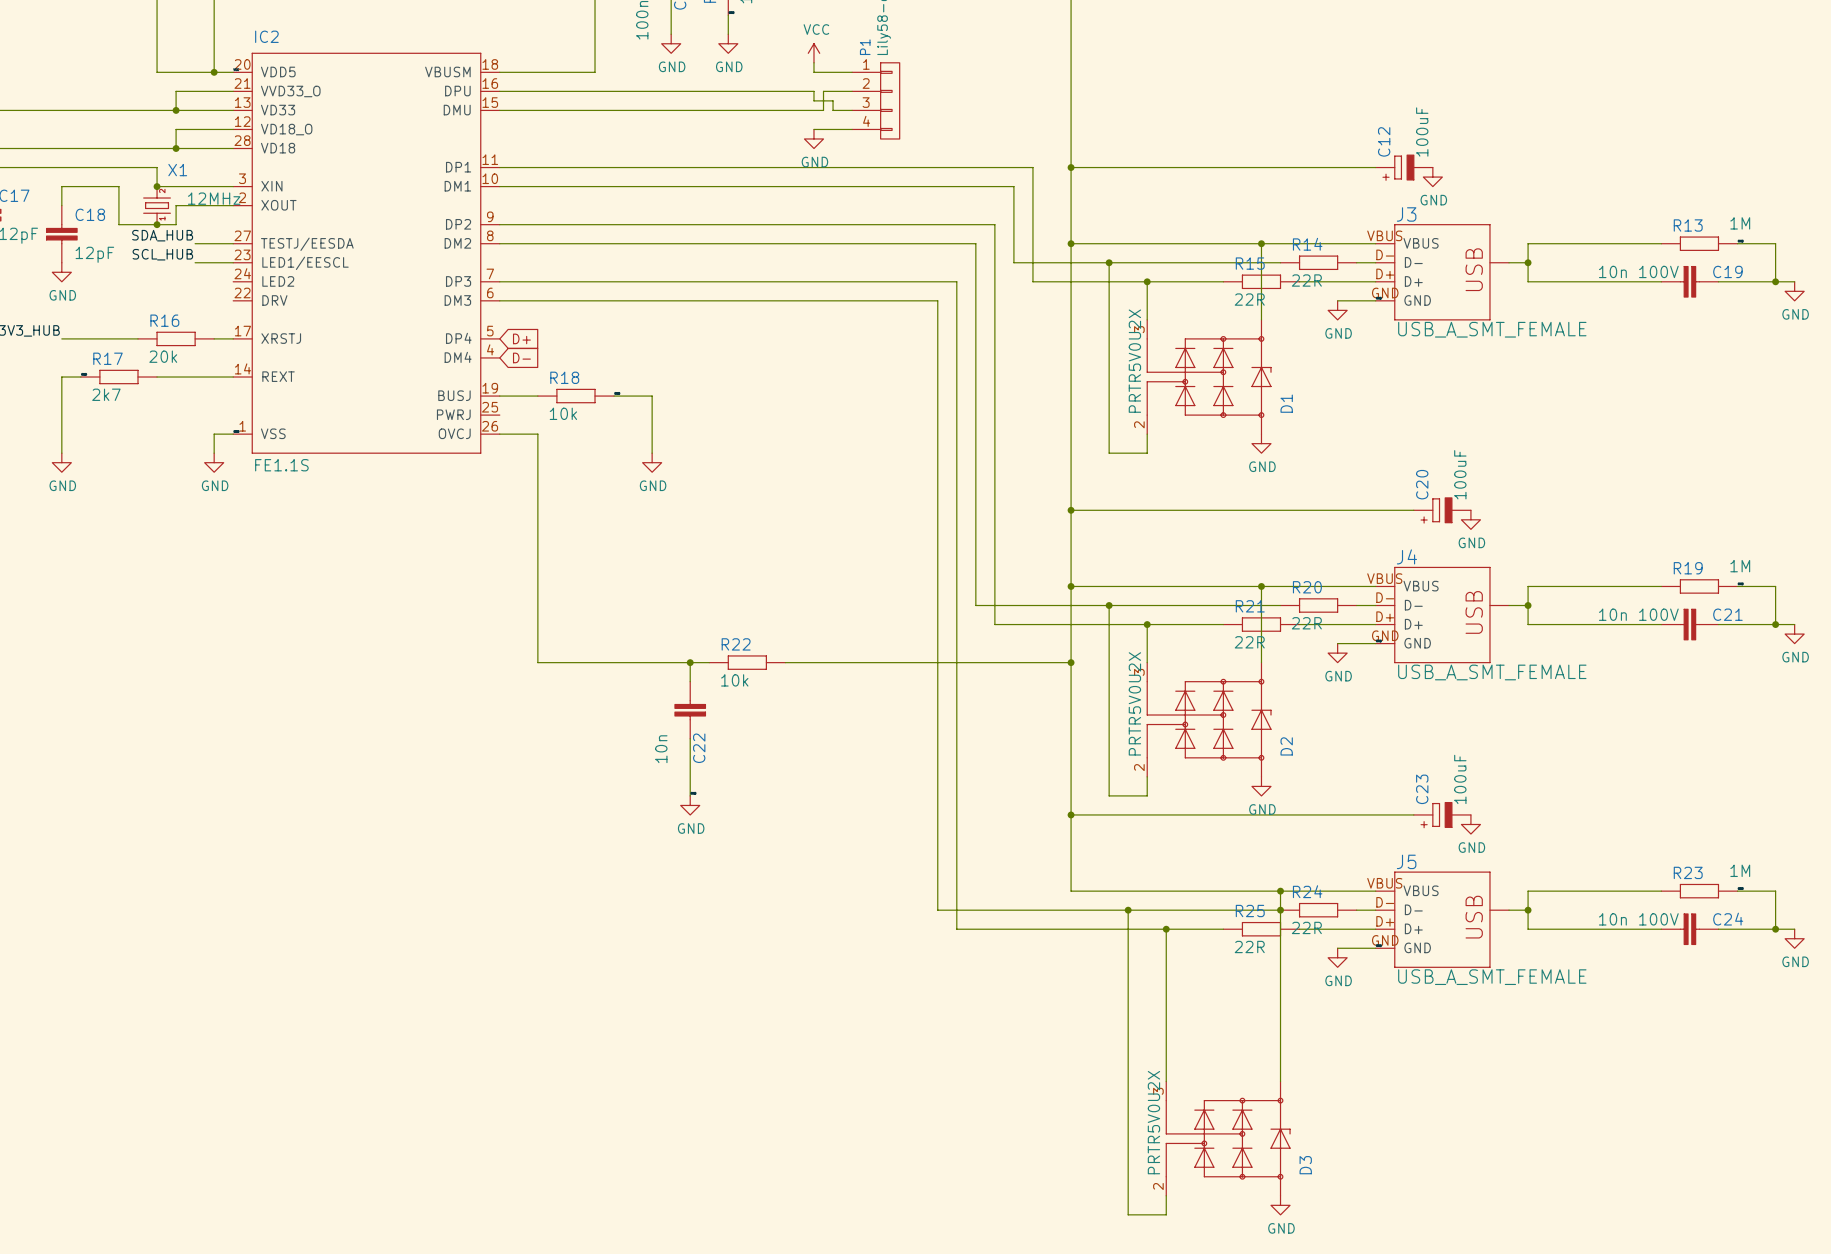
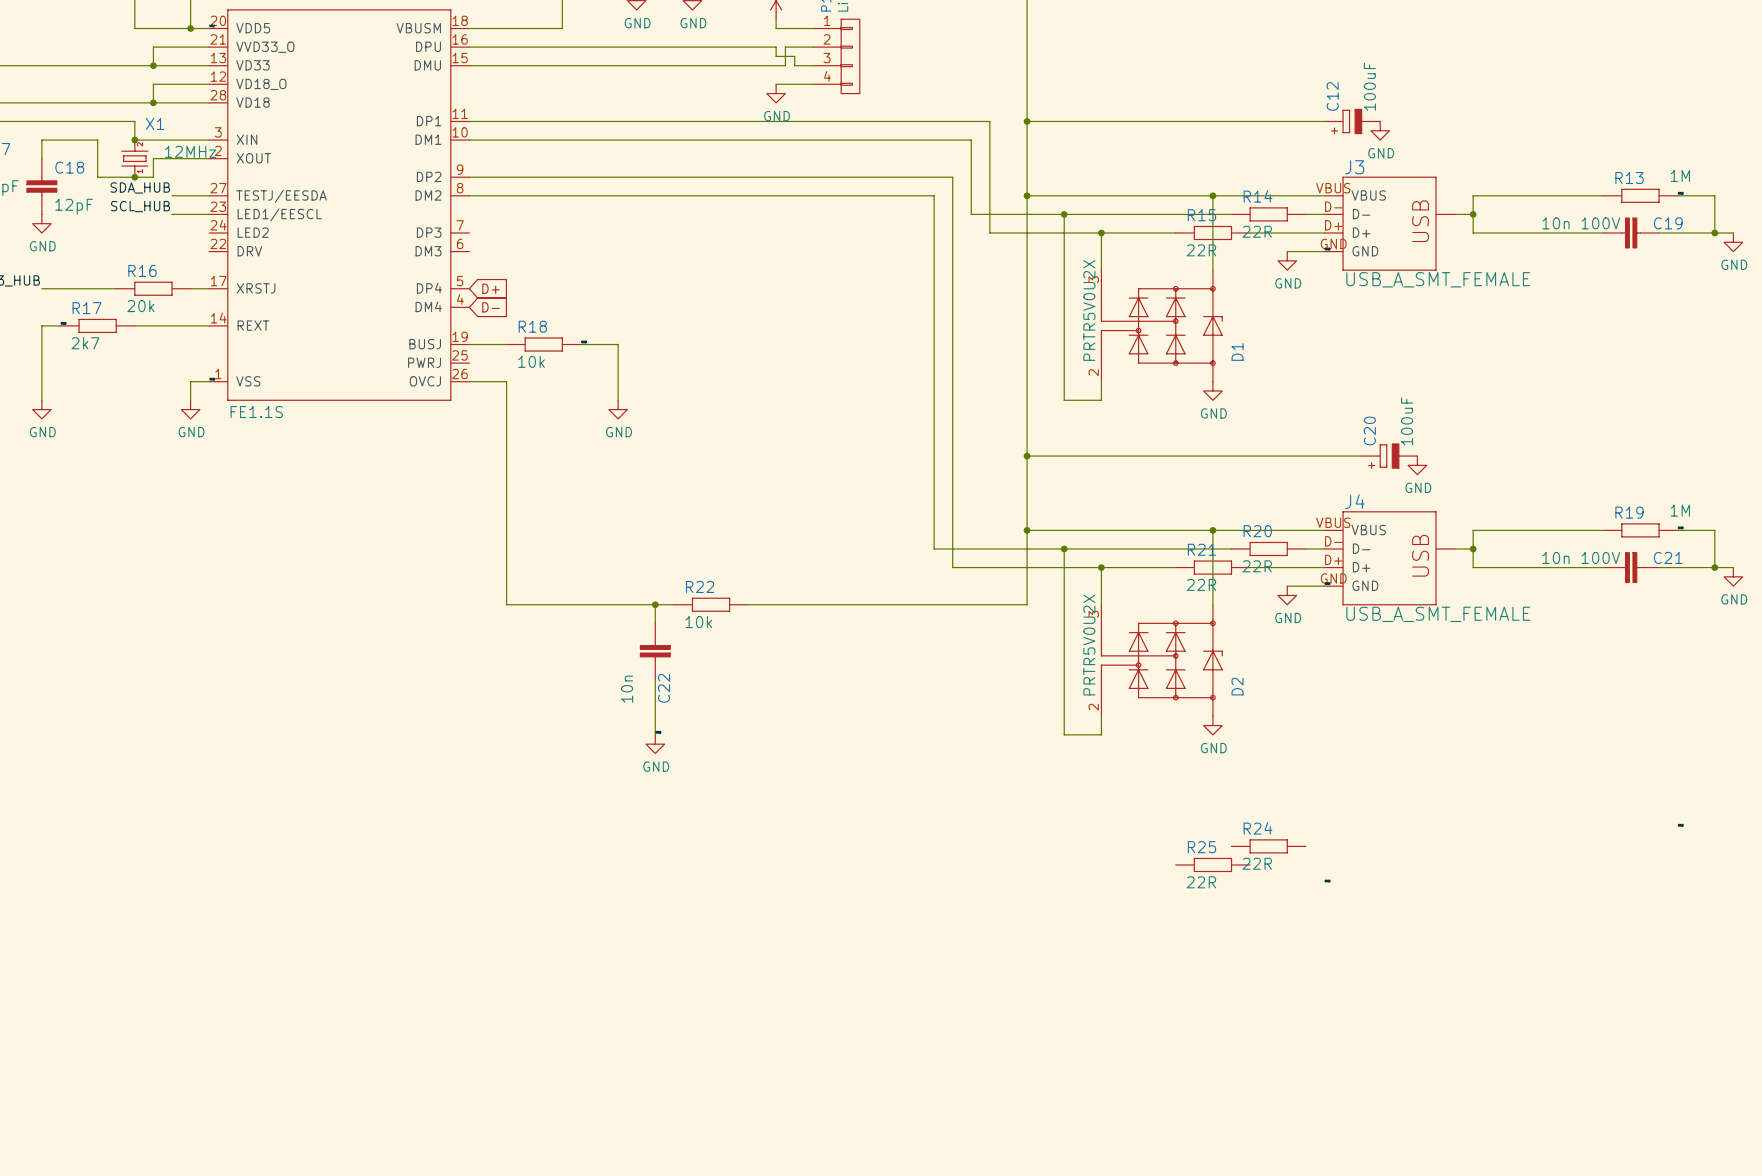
wire: (499, 281) (956, 281) (956, 929) (1223, 929) -> none
wire: (499, 300) (937, 300) (937, 910) (1280, 910) -> none
wire: (1071, 662) (1071, 891) (1375, 891) -> none
junction: (1071, 662) -> none
wire: (1071, 814) (1413, 814) -> none
junction: (1071, 814) -> none
C23: 100uF (1442, 814) -> none
power symbol: GND (1470, 824) -> none
wire: (1280, 891) (1280, 1081) -> none
junction: (1280, 891) -> none
wire: (1661, 891) (1528, 891) (1528, 929) (1661, 929) -> none
R23: 1M (1699, 891) -> none
wire: (1737, 891) (1775, 891) (1775, 929) -> none
wire: (1128, 910) (1128, 1214) (1166, 1214) (1166, 1195) -> none
junction: (1128, 910) -> none
junction: (1280, 910) -> none
wire: (1356, 910) (1375, 910) -> none
wire: (1509, 910) (1528, 910) -> none
junction: (1528, 910) -> none
J5: USB_A_SMT_FEMALE (1442, 919) -> none
wire: (1166, 929) (1166, 1081) -> none
junction: (1166, 929) -> none
wire: (1299, 929) (1375, 929) -> none
C24: 10n 100V (1689, 929) -> none
wire: (1718, 929) (1794, 929) -> none
junction: (1775, 929) -> none
power symbol: GND (1794, 938) -> none
wire: (1337, 948) (1375, 948) -> none
power symbol: GND (1337, 957) -> none
D3: PRTR5V0U2X (1228, 1138) -> none
power symbol: GND (1280, 1205) -> none

